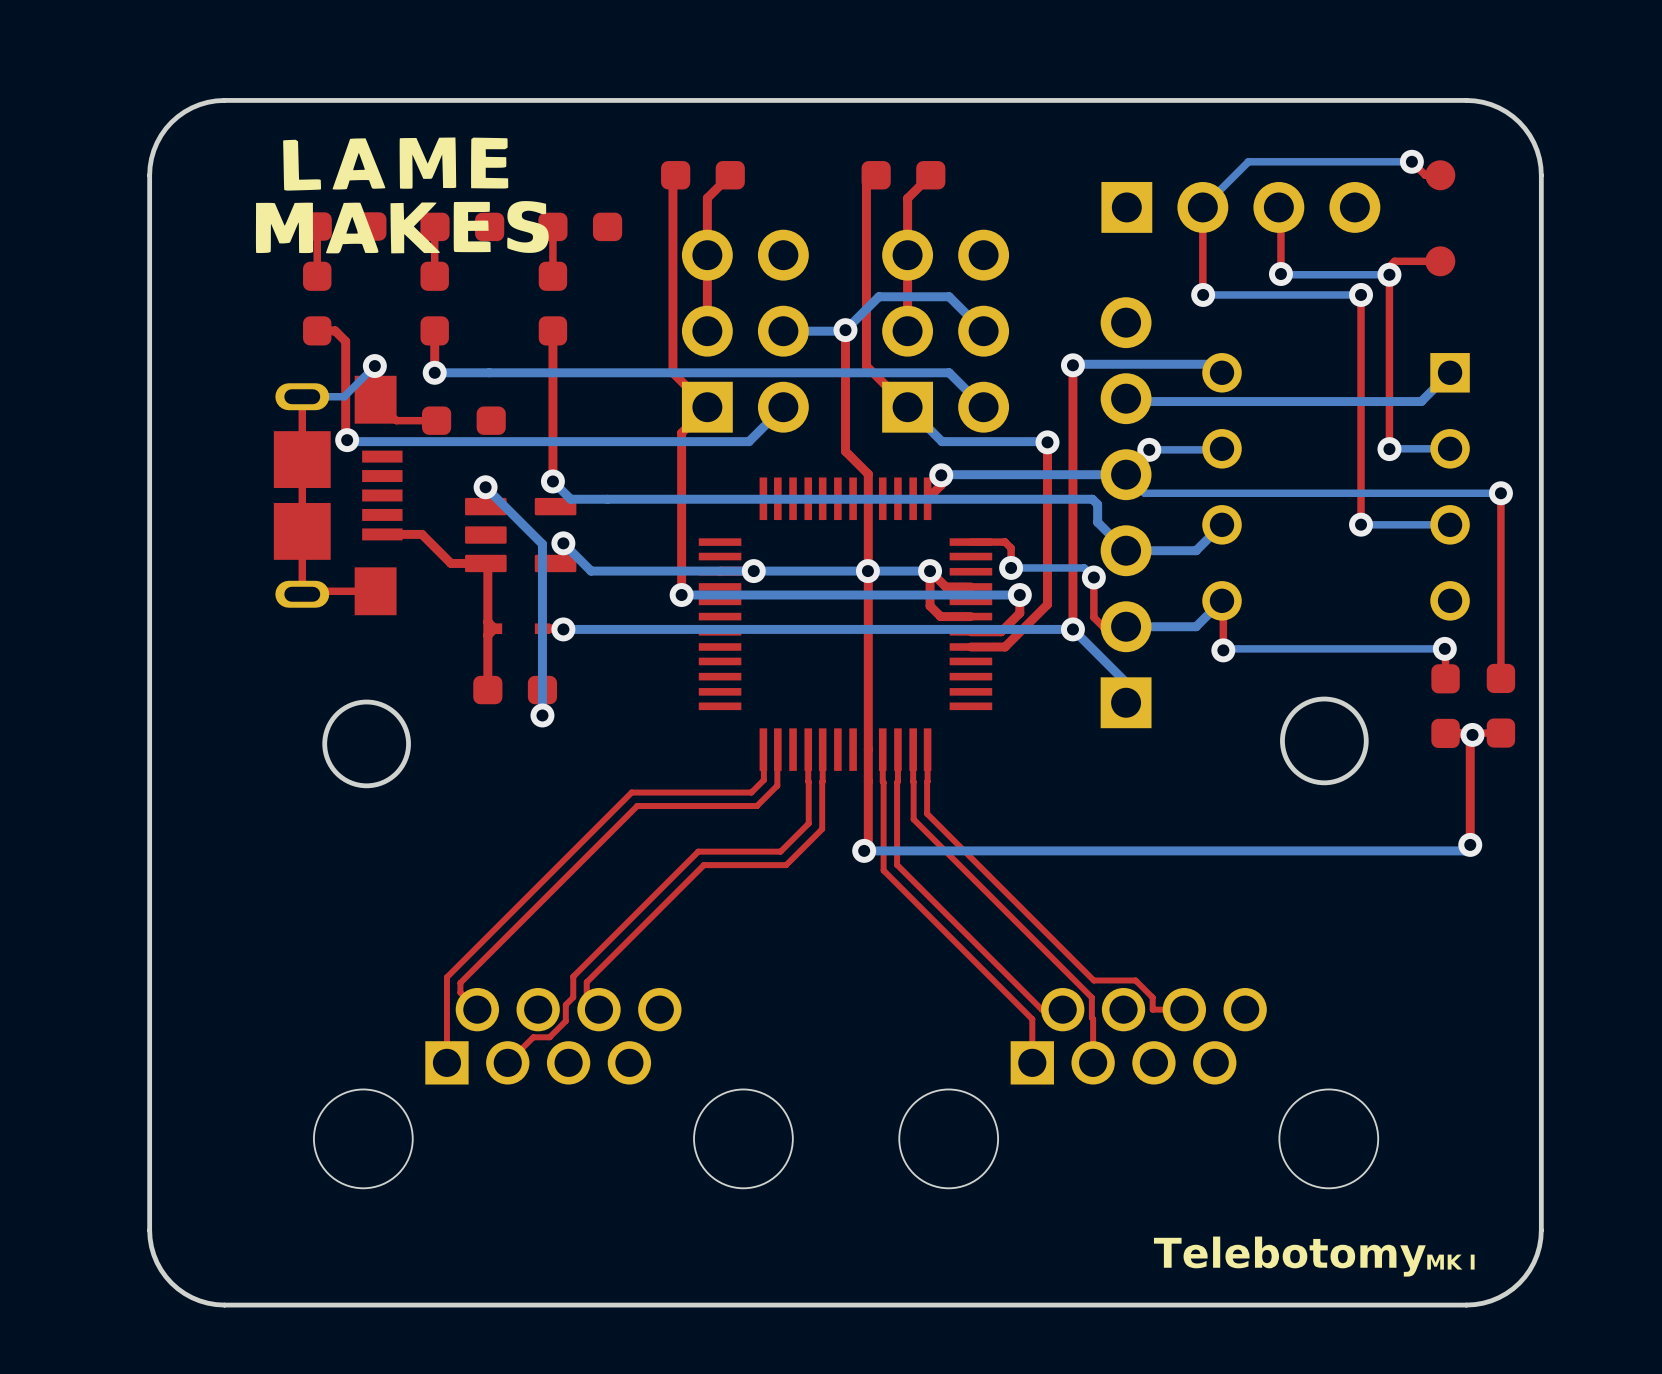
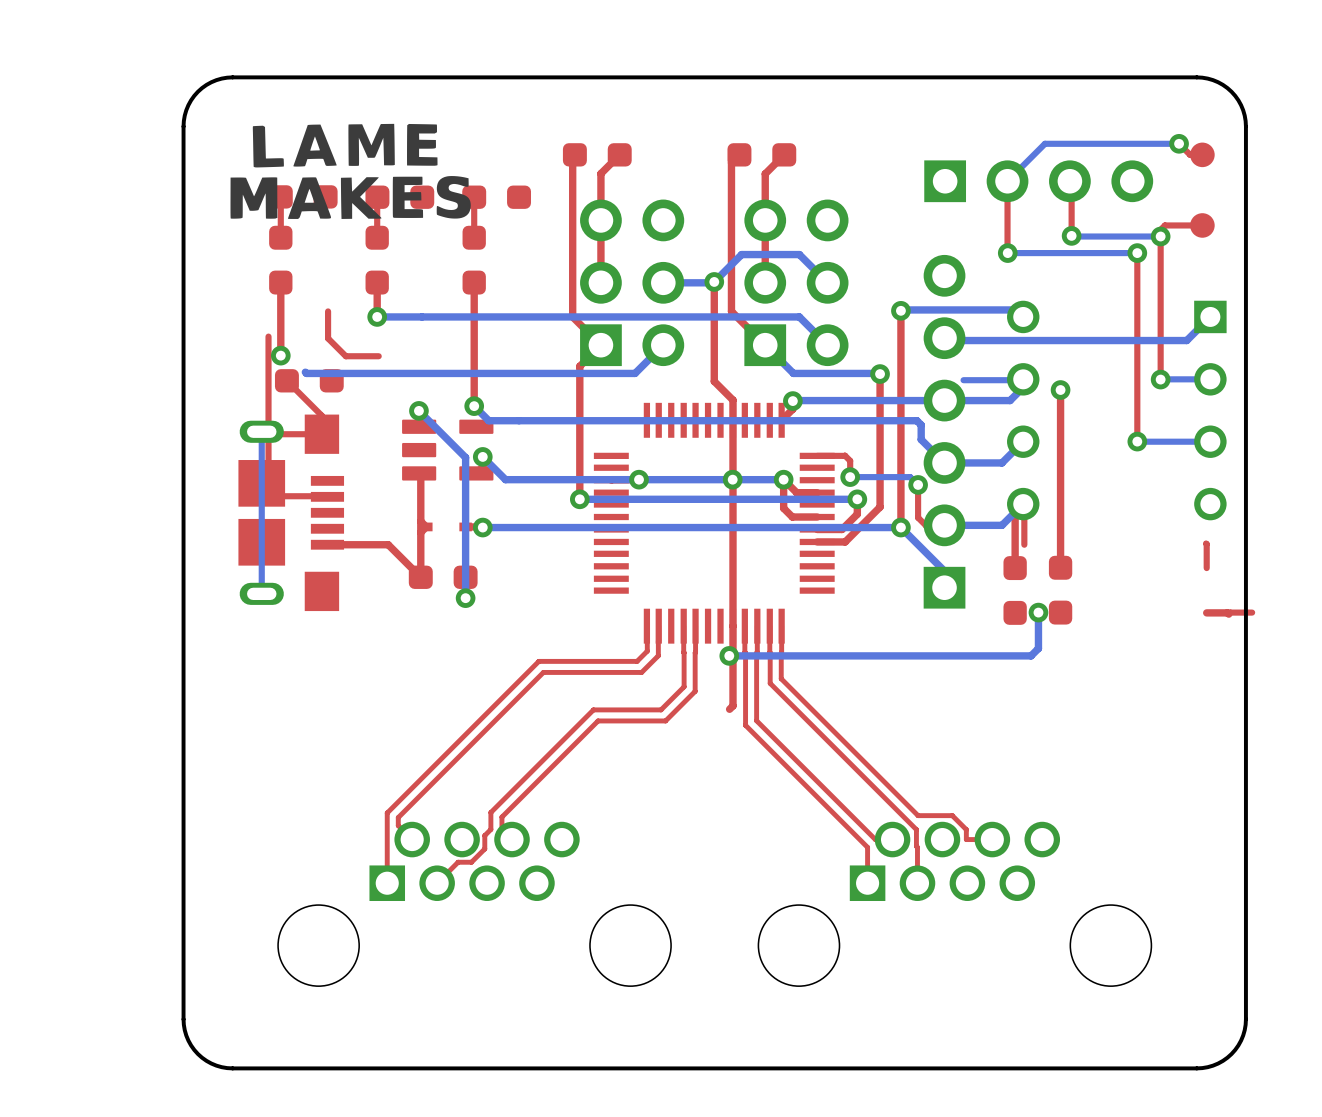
board edge: (1466, 100) (224, 100) (207, 102) (192, 107) (171, 122) (157, 142) (151, 158) (149, 175) (149, 1230) (153, 1254) (161, 1270) (171, 1283) (192, 1297) (207, 1303) (224, 1305) (1466, 1305) (1483, 1303) (1498, 1297) (1519, 1283) (1529, 1270) (1537, 1254) (1541, 1230) (1541, 175) (1539, 158) (1533, 142) (1519, 122) (1498, 107) (1483, 102) (1466, 100) -> (1196, 77) (1213, 80) (1231, 91) (1243, 110) (1245, 126) (1245, 1019) (1241, 1040) (1231, 1054) (1218, 1063) (1196, 1068) (232, 1068) (211, 1063) (197, 1054) (186, 1035) (183, 1019) (183, 126) (188, 105) (197, 91) (216, 80) (232, 77) (1196, 77)
top track: (317, 330) (335, 330) (345, 341) (347, 440) -> (280, 282) (280, 355)
bottom track: (374, 366) (344, 396) (302, 396) -> none
via: (374, 366) -> none
part position: (463, 420) -> (309, 380)
via position: (347, 440) -> (280, 355)
via: (1149, 449) -> none
top track: none -> (286, 380) (321, 415) (321, 434) (264, 434) (261, 431)
top track: none -> (1060, 390) (1060, 567)
via: none -> (1060, 390)
bottom track: (1126, 474) (1144, 493) (1500, 493) -> (944, 400) (1010, 400) (1023, 387)
top track: (1500, 493) (1500, 678) -> none
via: (1500, 493) -> none
part position: (338, 495) -> (291, 512)
bottom track: none -> (261, 431) (261, 593)
top track: (382, 534) (422, 534) (451, 563) (485, 563) -> none
top track: none -> (1015, 512) (1015, 568)
bottom track: (1444, 648) (1223, 650) -> none
via: (1444, 648) -> none
top track: none -> (327, 544) (388, 544) (420, 577)
via position: (1223, 650) -> (1038, 612)
round board edge: [1280, 696, 1369, 786] -> none
round board edge: [322, 699, 411, 789] -> none
part: none -> (1060, 590)
part: (1500, 705) -> none
part: none -> (1015, 590)
part: (1445, 706) -> none
bottom track: none -> (1038, 612) (1038, 648) (1031, 655) (729, 655)
top track: (1472, 734) (1470, 737) (1470, 844) -> none
via: (1472, 734) -> none
bottom track: (1470, 844) (1464, 850) (864, 850) -> none
via: (1470, 844) -> none
via position: (864, 850) -> (729, 655)
text: Telebotomy (1289, 1256) -> none
text: MK I (1450, 1262) -> none

